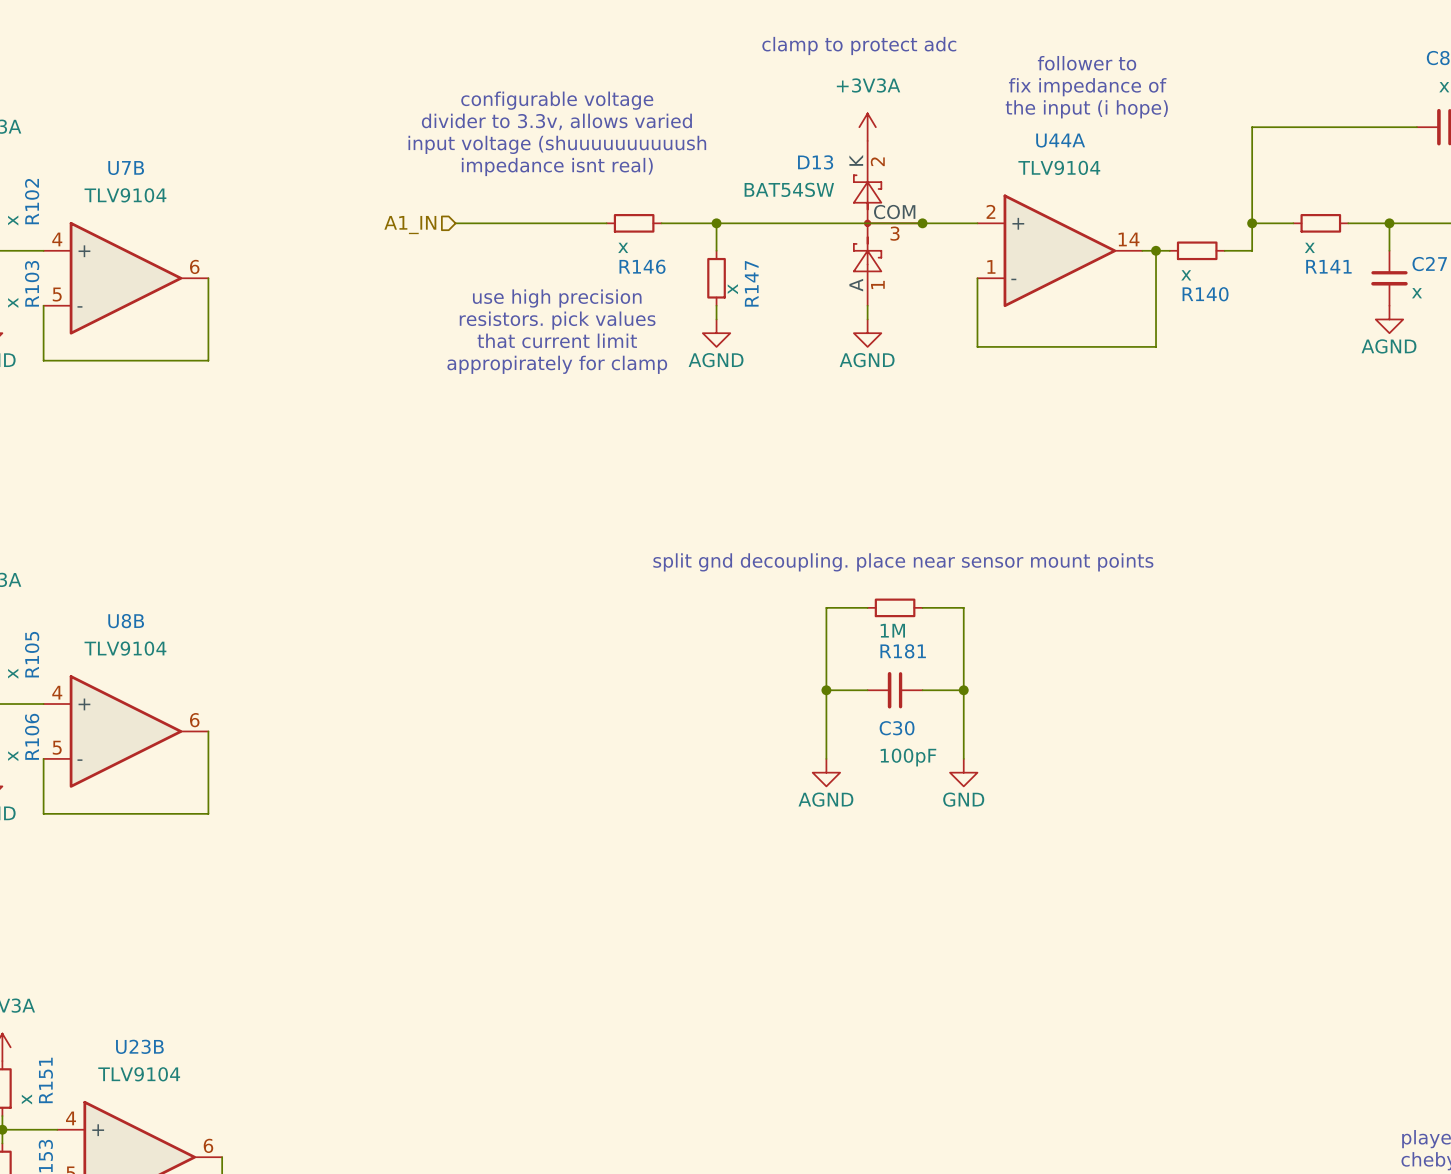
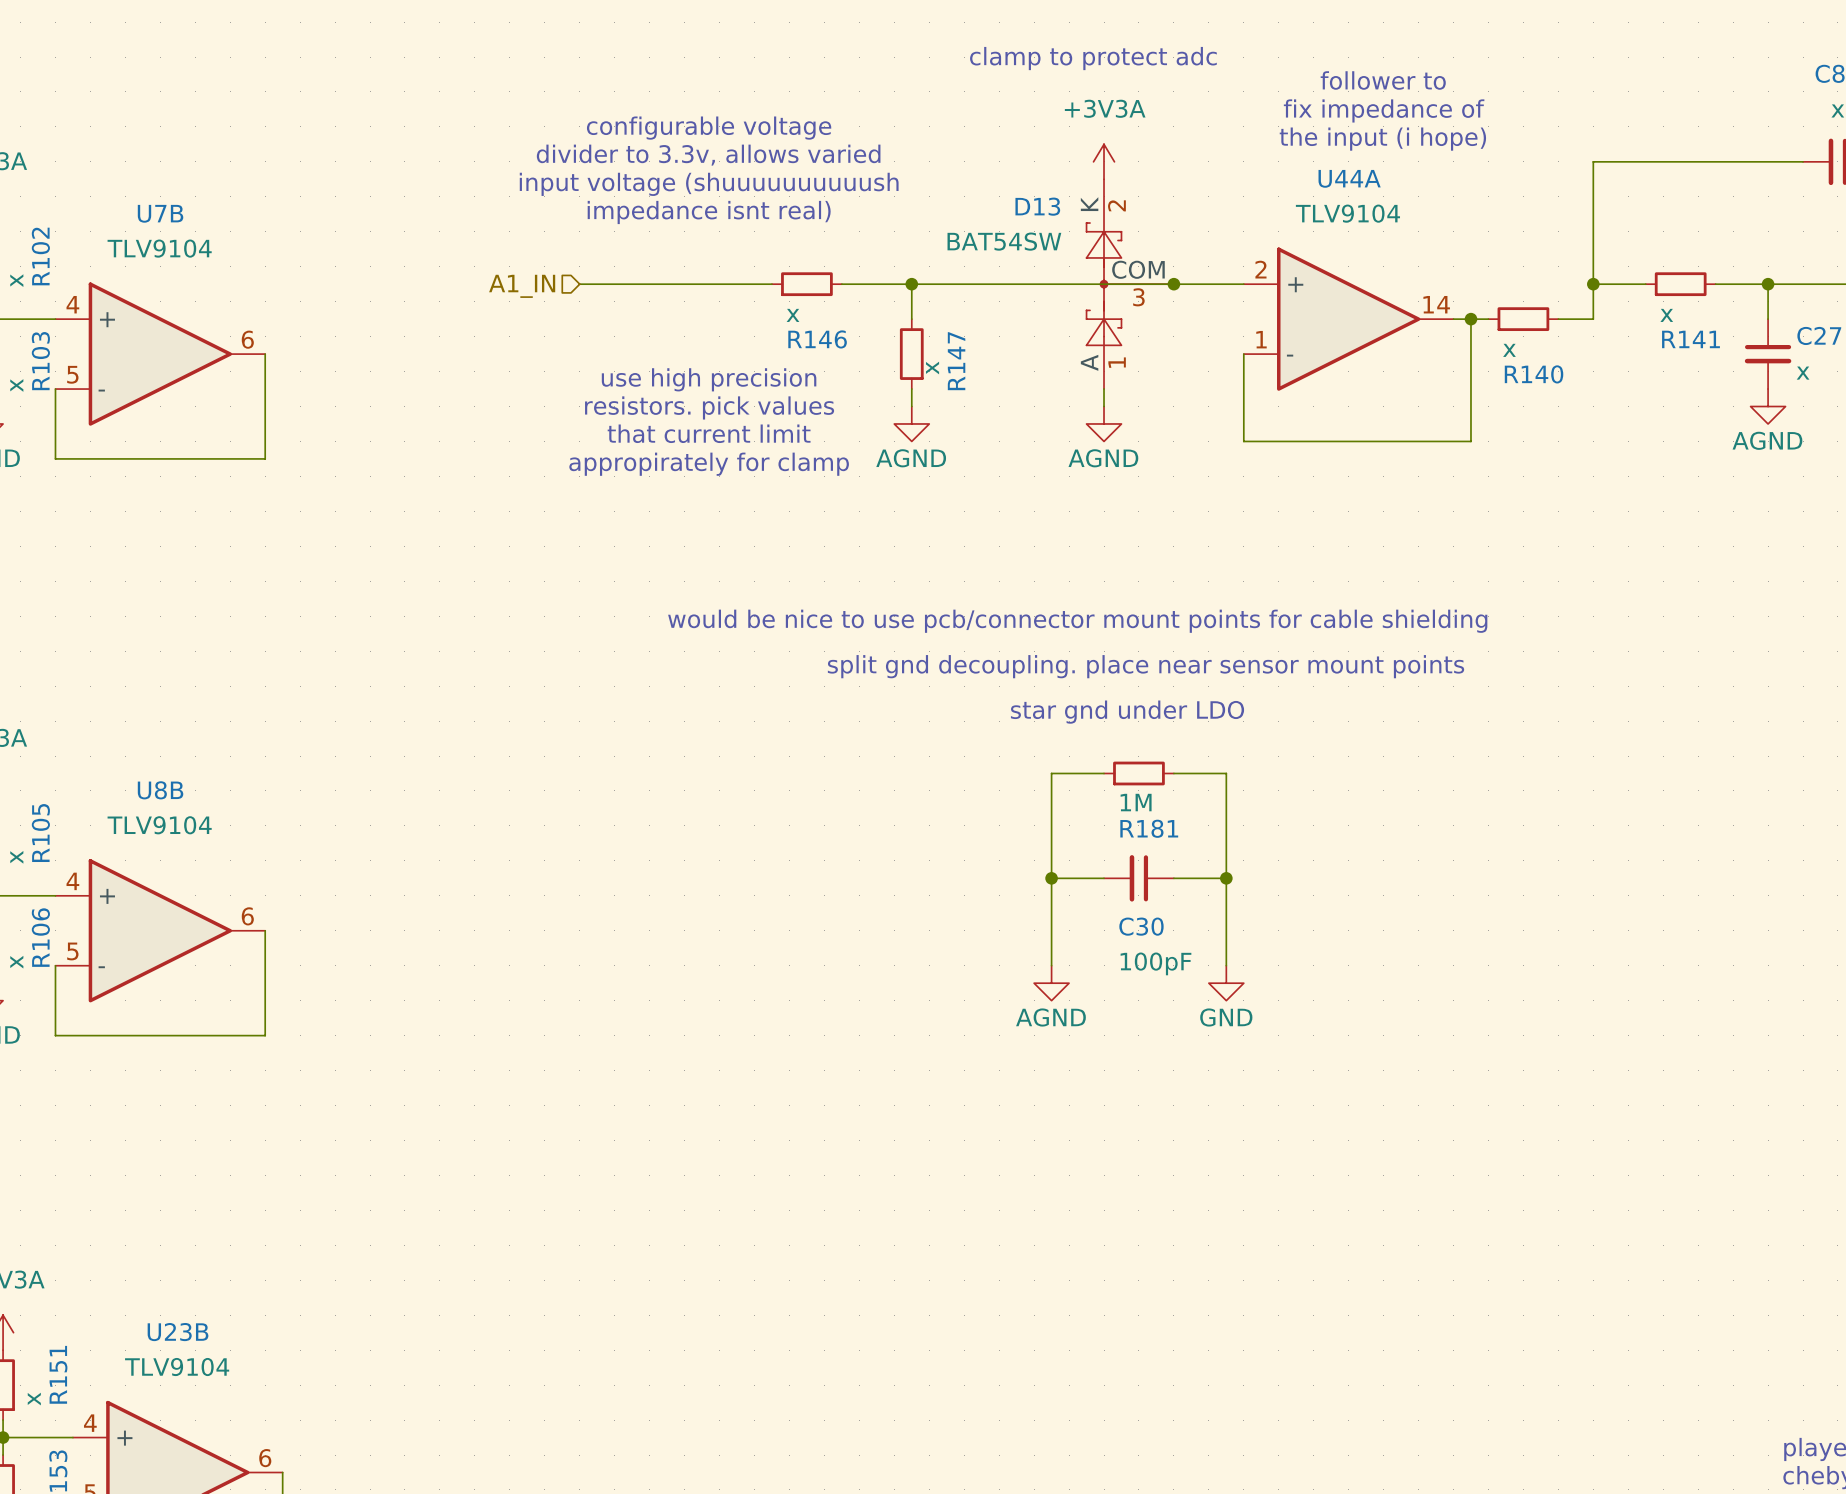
text: none -> would be nice to use pcb/connector mount points for cable shielding (1077, 621)
text: none -> star gnd under LDO (1127, 712)
text position: split gnd decoupling. place near sensor mount points (903, 562) -> split gnd decoupling. place near sensor mount points (1146, 666)

